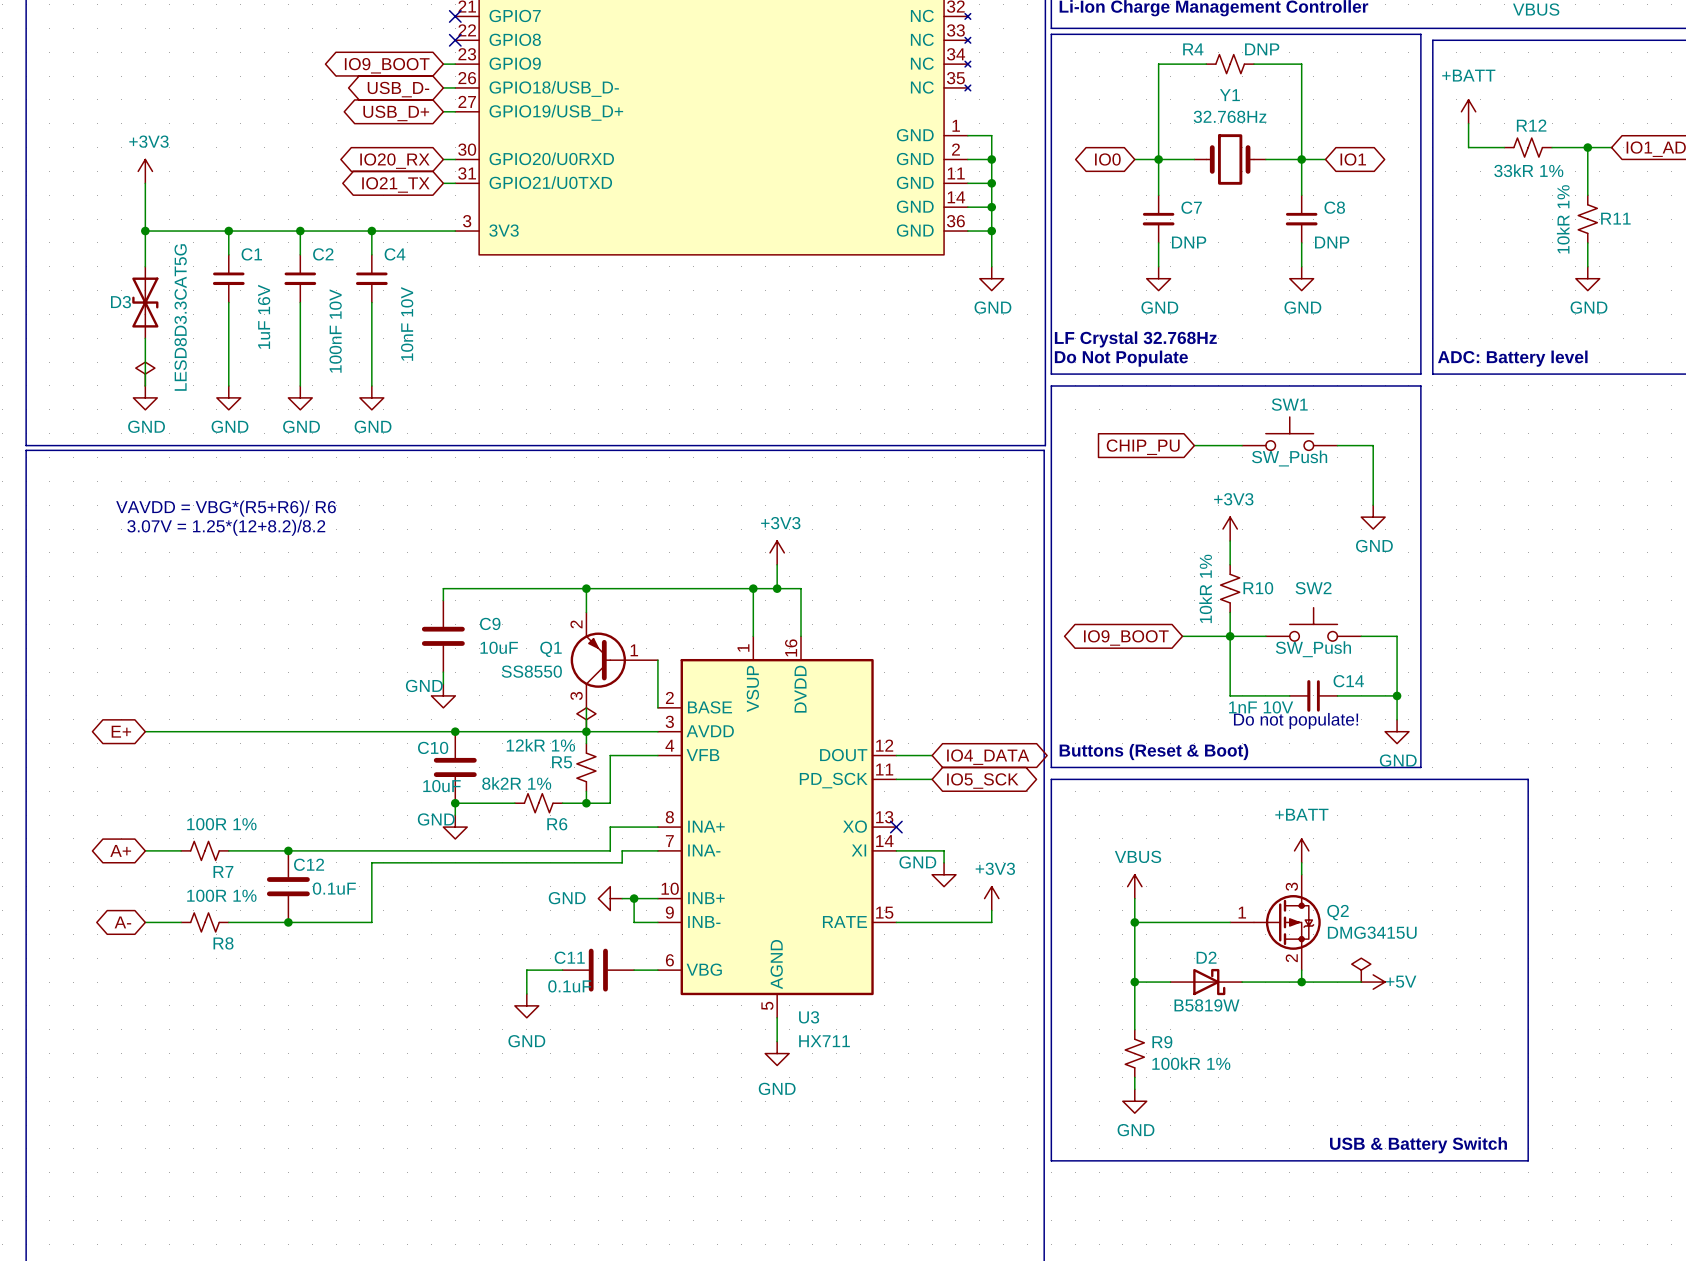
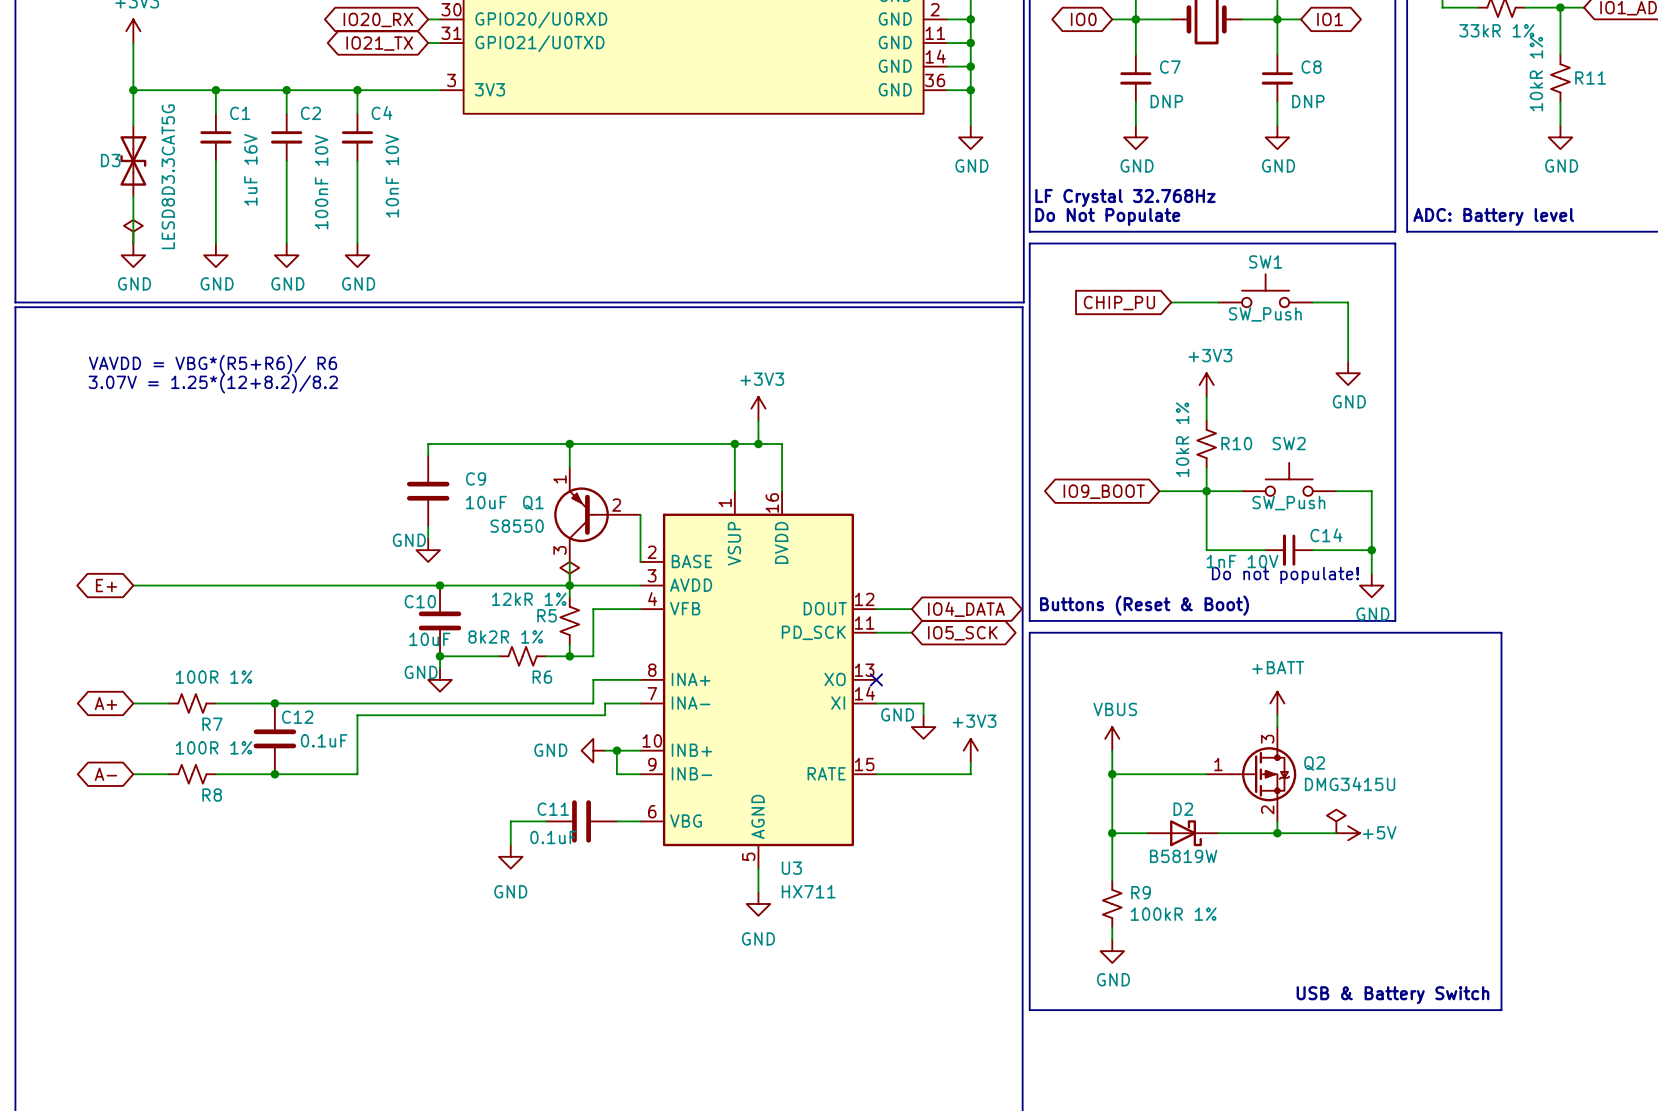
Q1 pin number: 2 (576, 624) -> 1 (560, 479)
Q1 pin number: 1 (634, 650) -> 2 (616, 505)
Q1 value: SS8550 (531, 671) -> S8550 (517, 526)

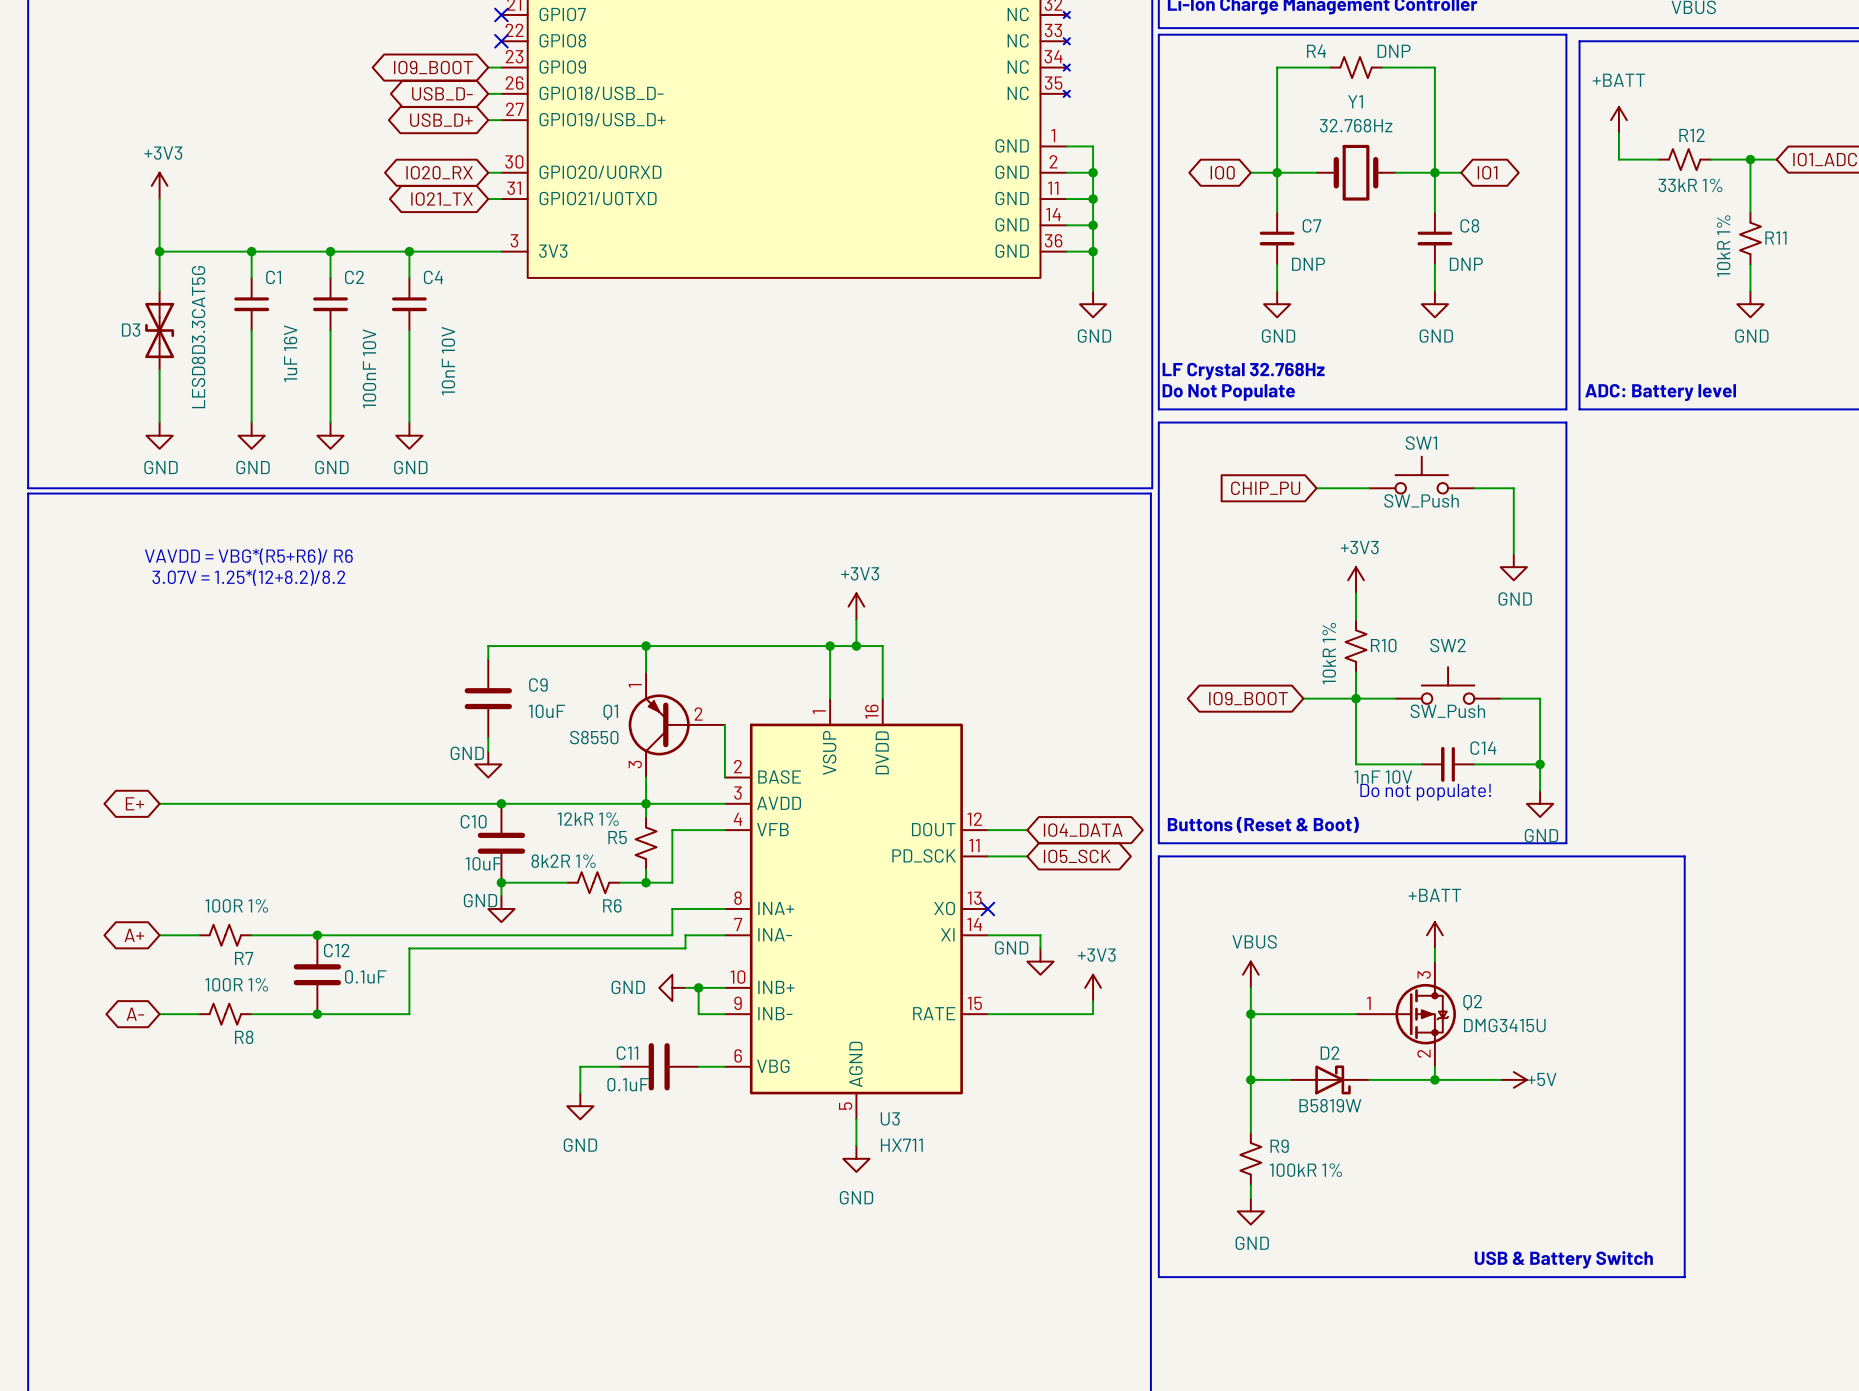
power symbol: (133, 231) -> none
power symbol: (569, 573) -> none
power symbol: (1336, 821) -> none

